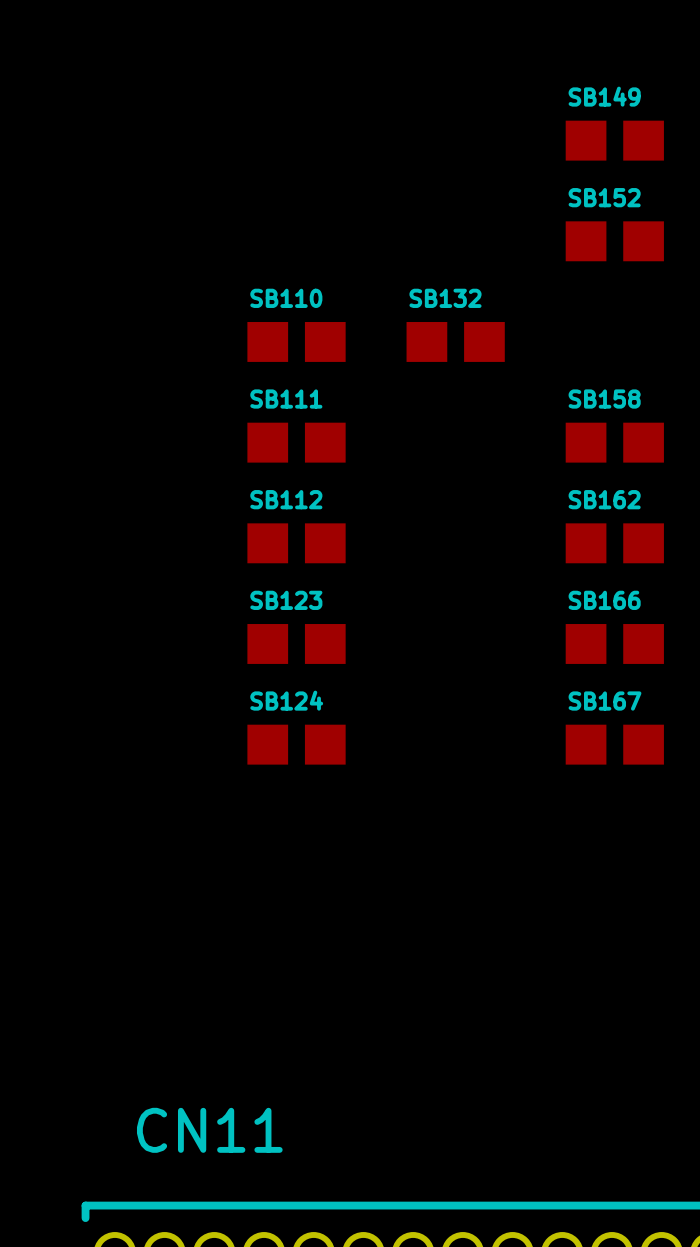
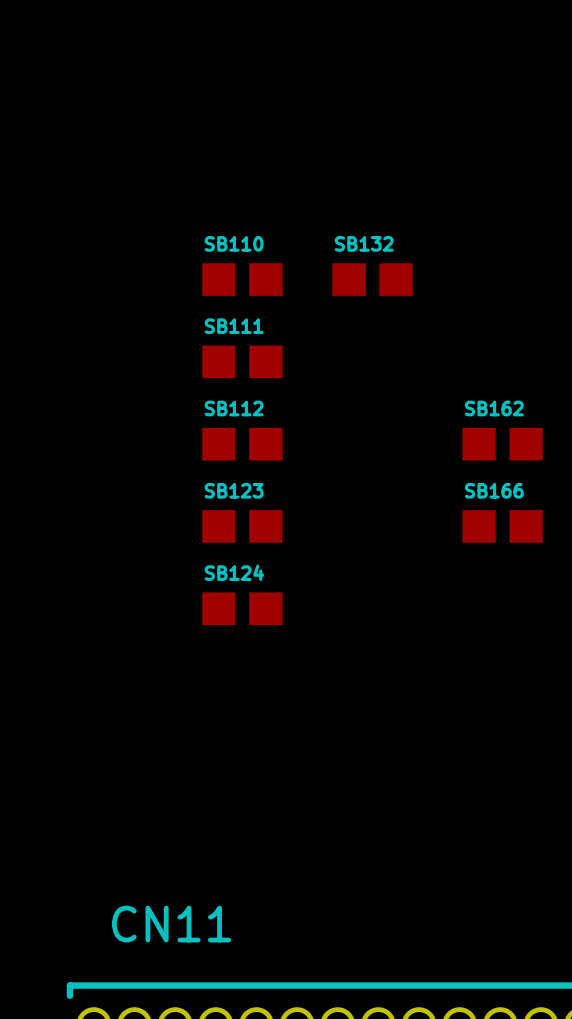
SB149: (614, 140) -> none
SB152: (614, 241) -> none
SB158: (614, 442) -> none
SB167: (614, 744) -> none

